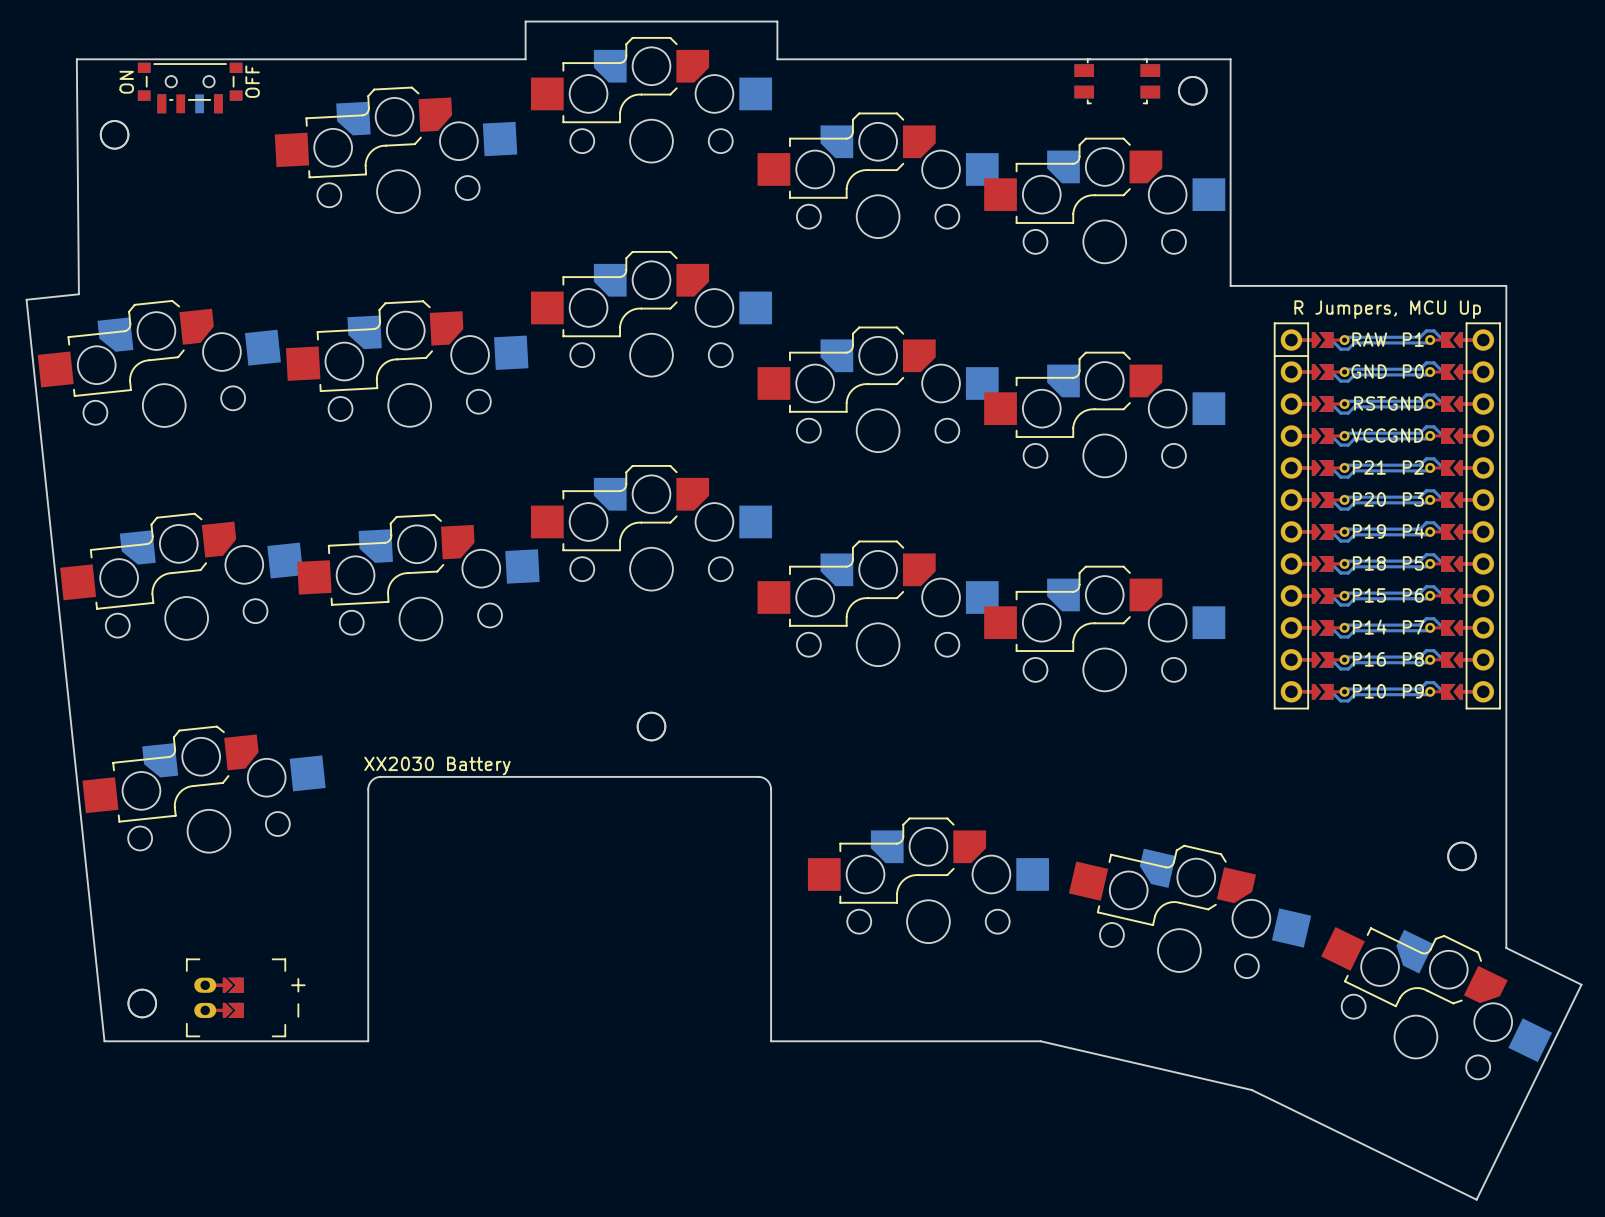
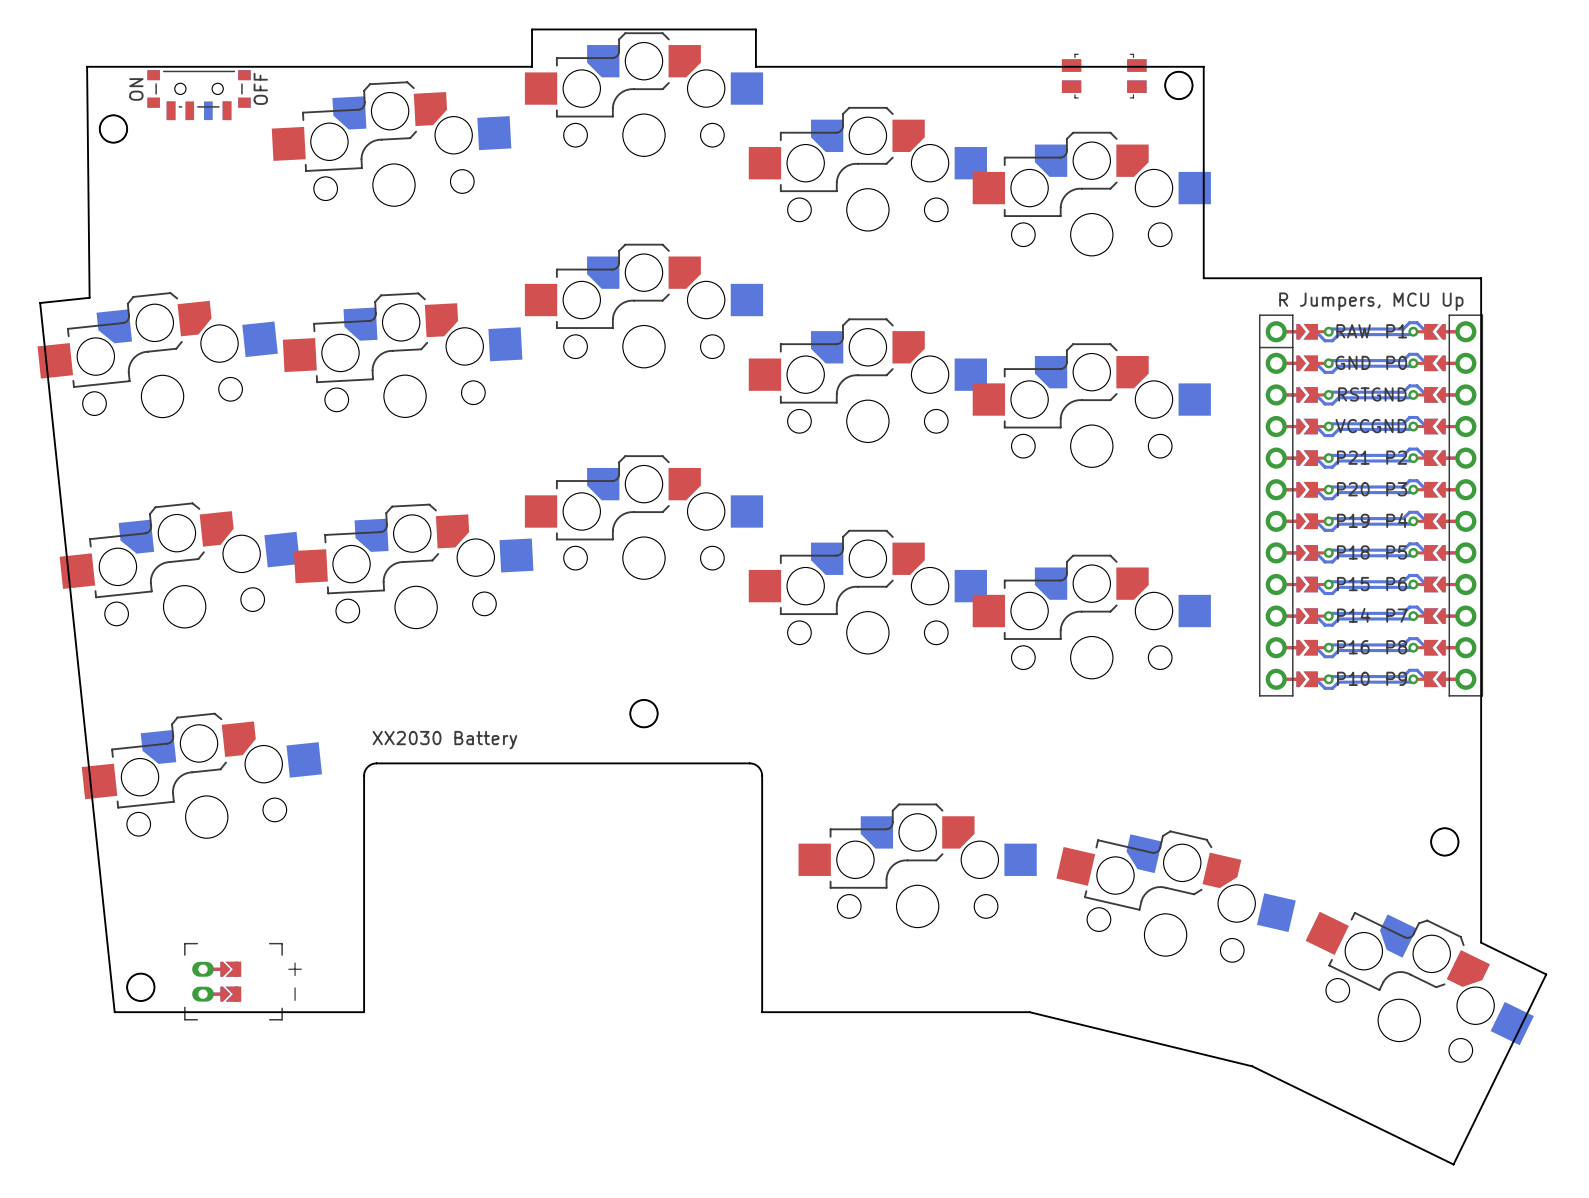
part position: (190, 88) -> (199, 95)
board edge: (1230, 285) (1230, 59) (777, 59) (777, 21) (525, 21) (525, 59) (76, 59) (78, 294) (26, 299) (104, 1041) (368, 1041) (368, 1028) -> (1216, 278) (1203, 278) (1203, 66) (755, 66) (755, 29) (532, 29) (532, 66) (87, 66) (89, 297) (40, 303) (114, 1012) (364, 1012)
board edge: (1498, 285) (1506, 285) (1506, 948) (1581, 984) (1476, 1199) (1251, 1090) (1040, 1041) (771, 1041) (771, 1028) -> (1481, 278) (1481, 942) (1546, 974) (1453, 1164) (1252, 1066) (1029, 1012) (762, 1012)
text position: XX2030 Battery (437, 765) -> XX2030 Battery (444, 740)

